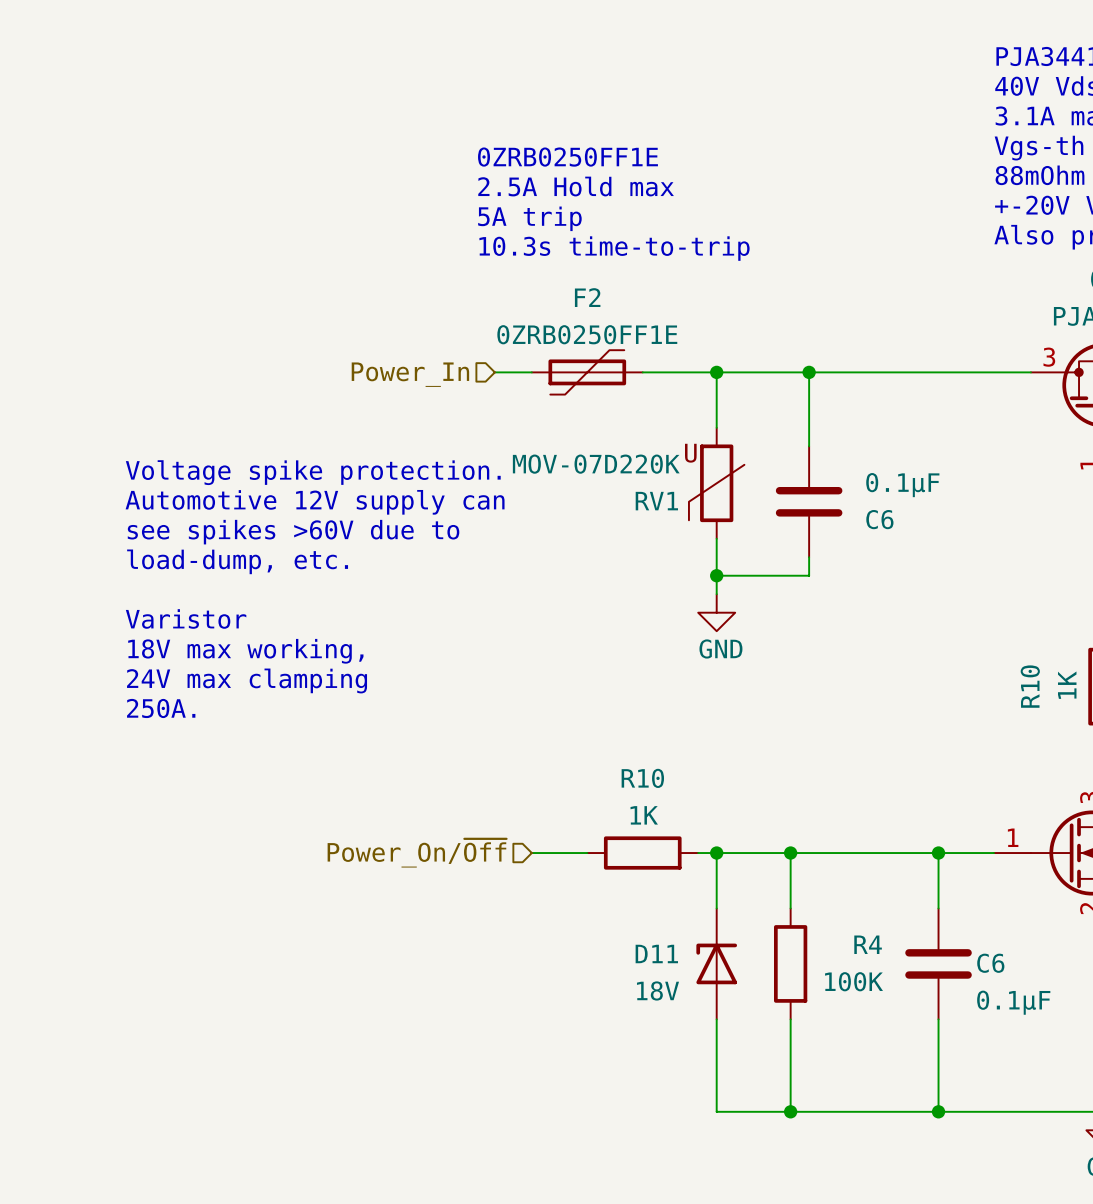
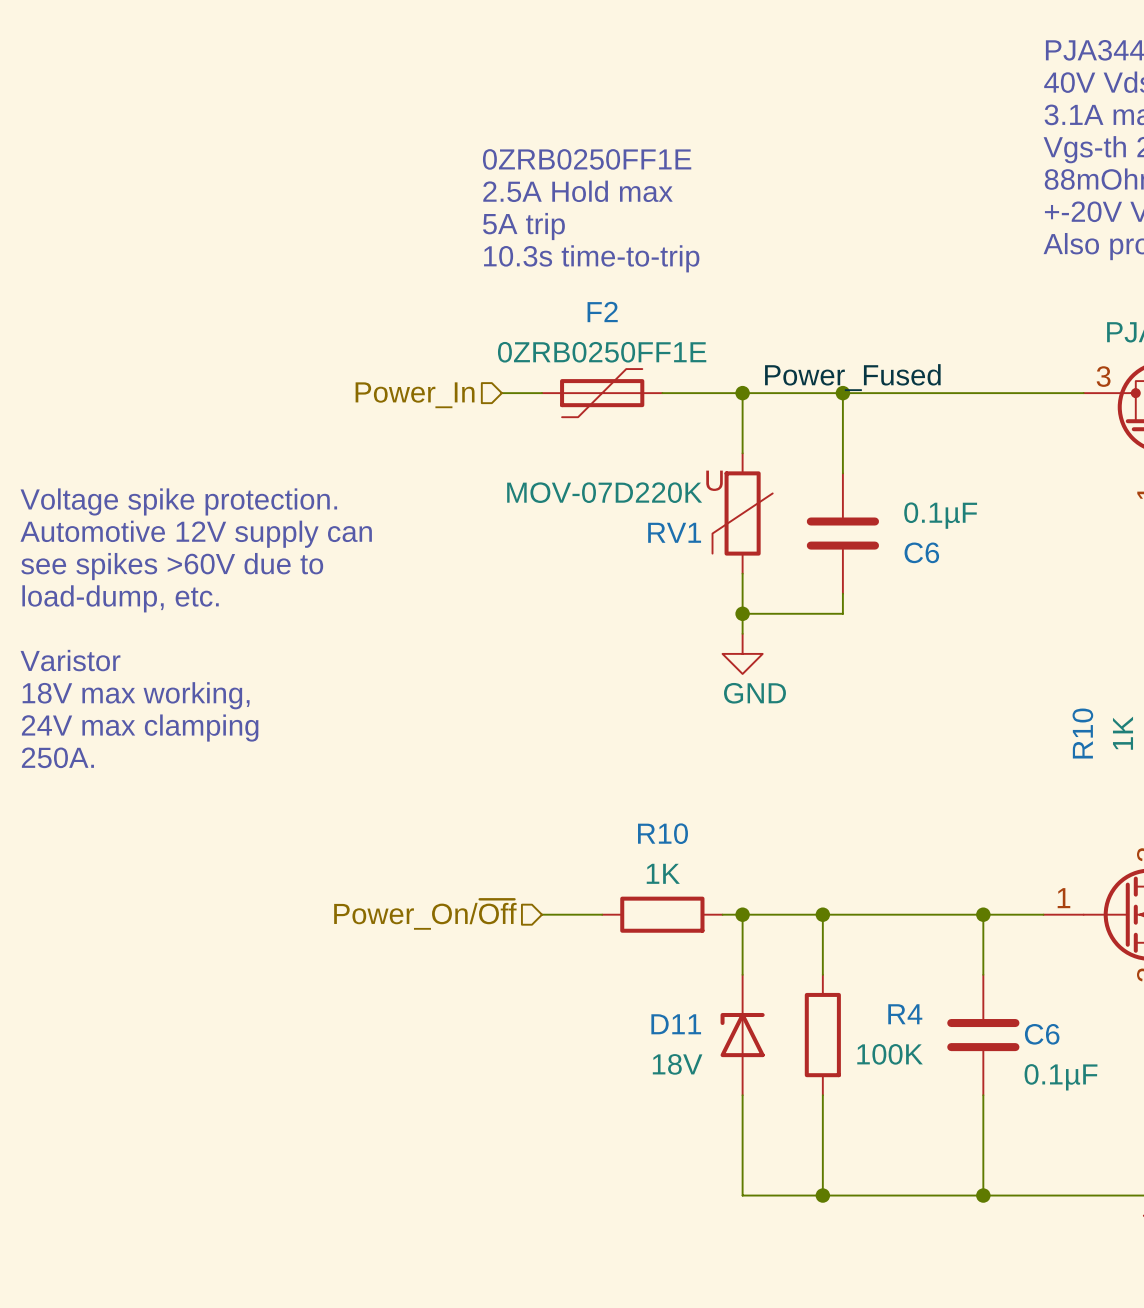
label: none -> Power_Fused (852, 377)
text position: Voltage spike protection. (313, 472) -> Voltage spike protection. (178, 501)
text position: Automotive 12V supply can (315, 502) -> Automotive 12V supply can (196, 534)
text position: see spikes >60V due to (293, 532) -> see spikes >60V due to (172, 566)
text position: load-dump, etc. (237, 561) -> load-dump, etc. (120, 598)
text position: Varistor (186, 618) -> Varistor (70, 660)
text position: 18V max working, (245, 651) -> 18V max working, (136, 695)
text position: 24V max clamping (247, 680) -> 24V max clamping (140, 728)
text position: 250A. (161, 708) -> 250A. (57, 757)

